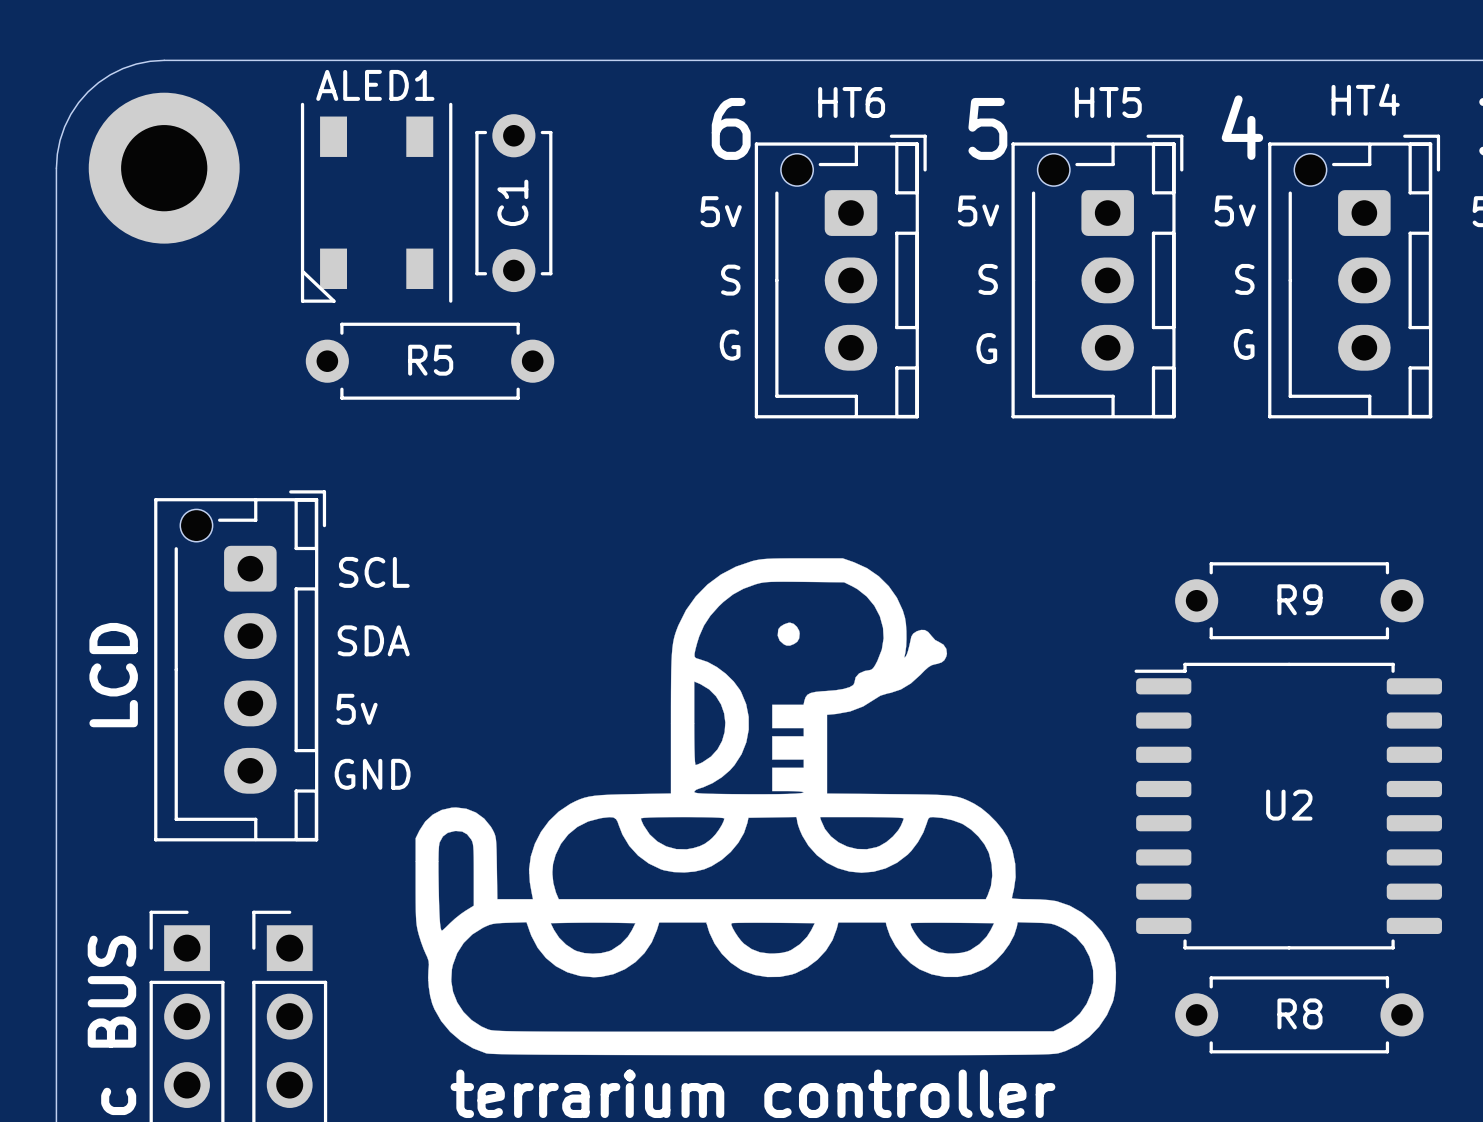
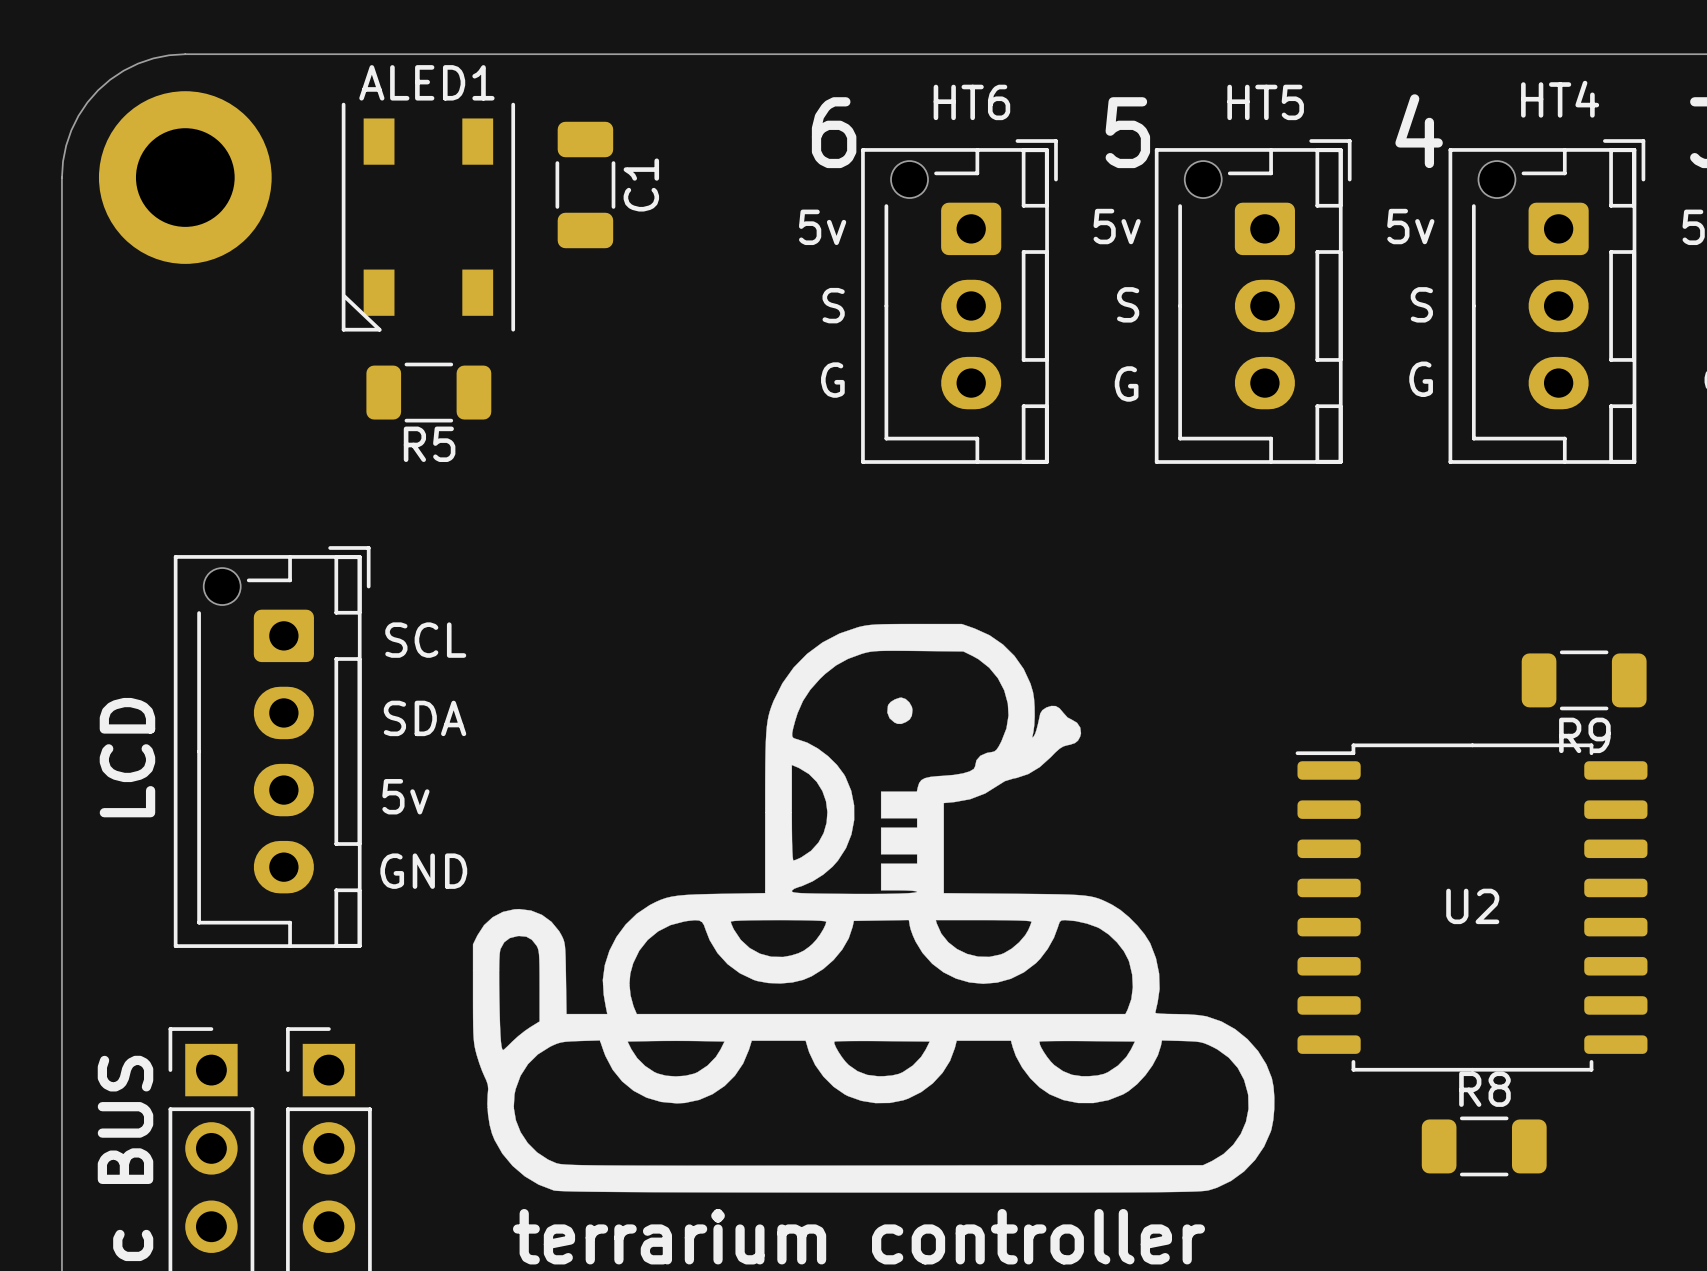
C1 footprint: [475, 114, 553, 293] -> [555, 121, 616, 249]
R5 footprint: [305, 322, 555, 400] -> [366, 362, 492, 423]
R9 footprint: [1175, 562, 1424, 640] -> [1521, 650, 1647, 711]
R8 footprint: [1175, 976, 1424, 1054] -> [1421, 1116, 1547, 1177]

